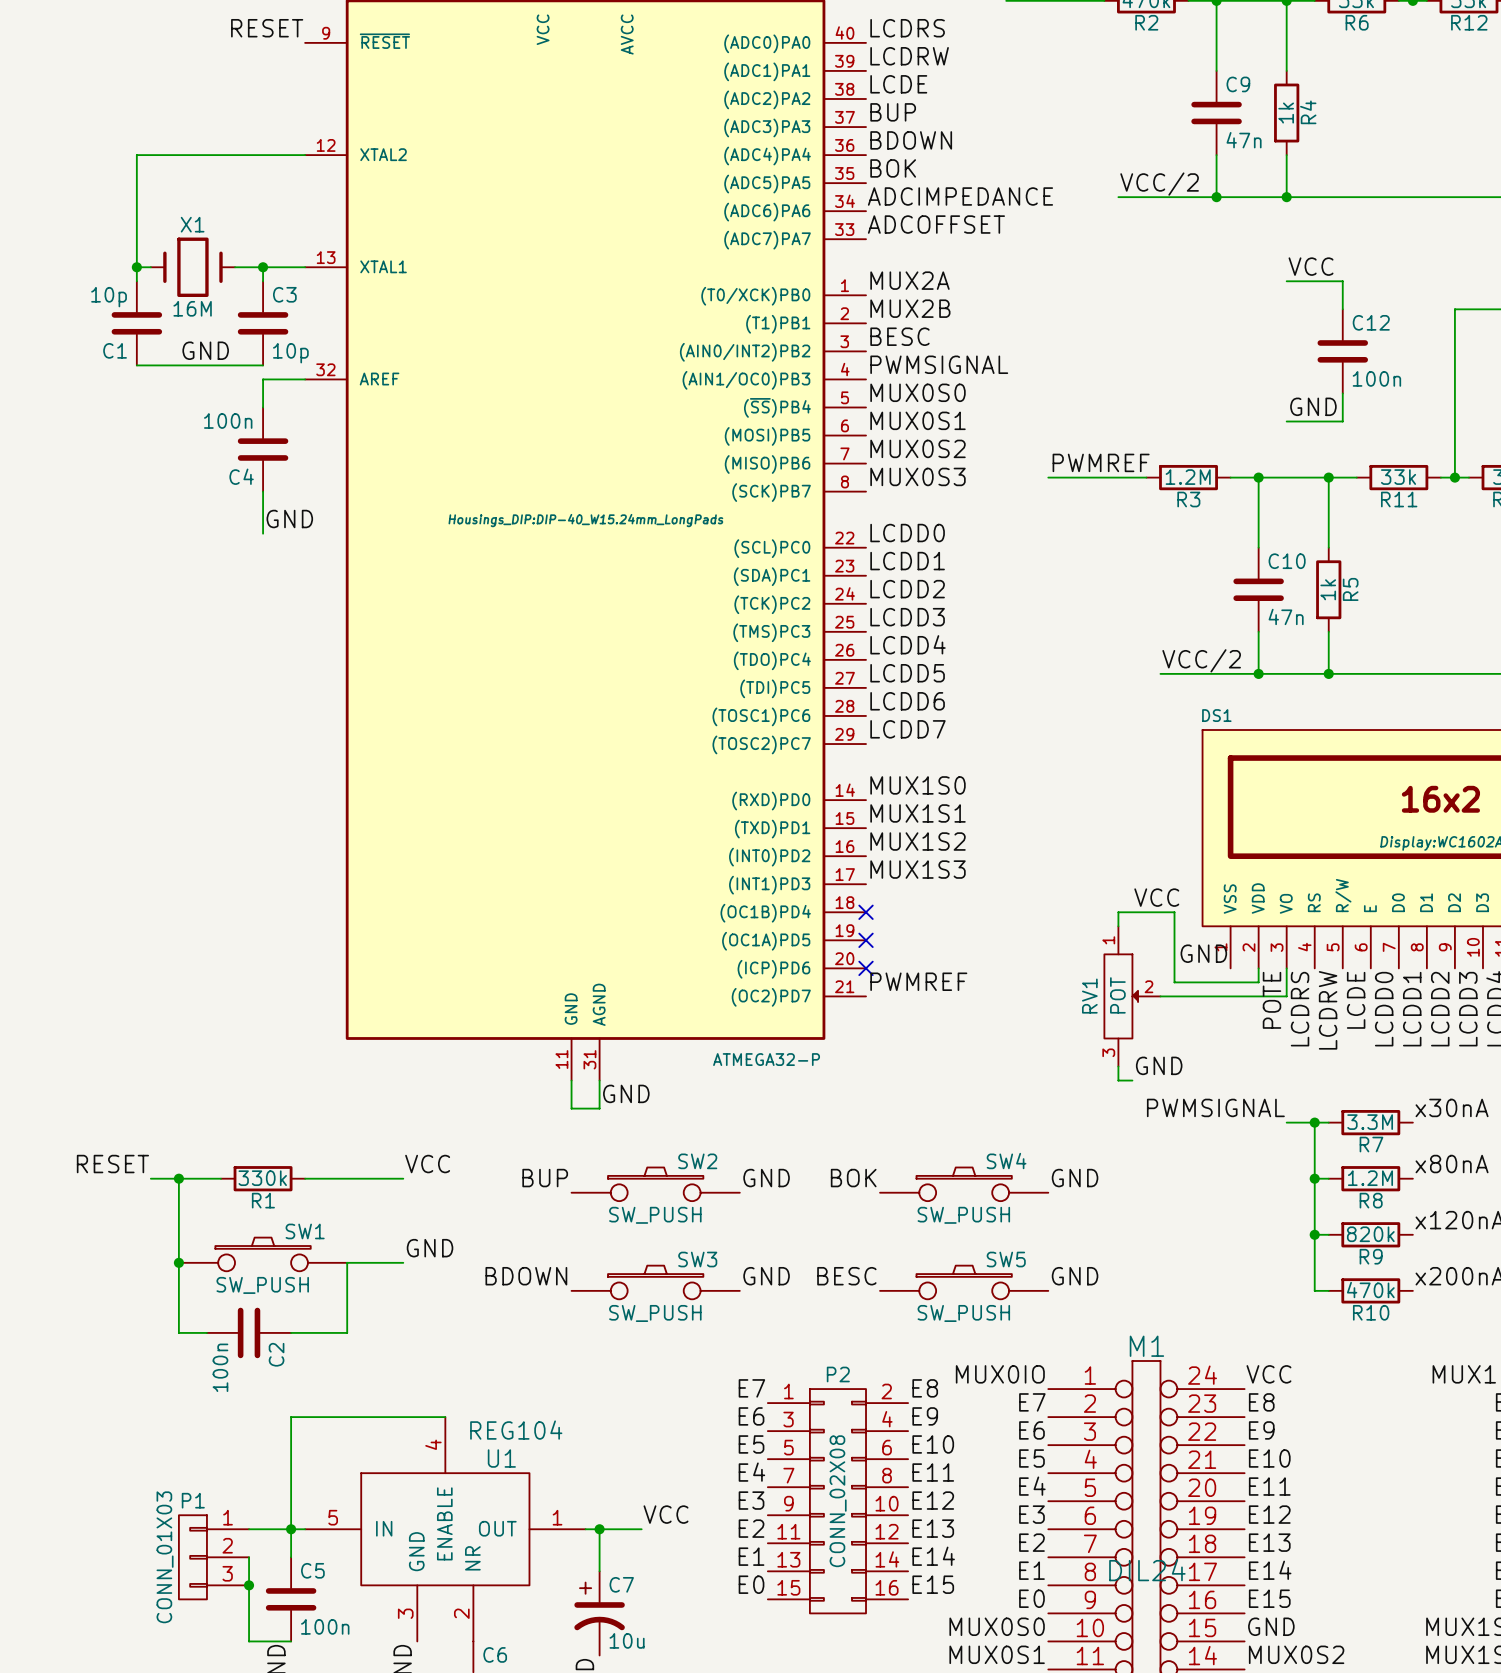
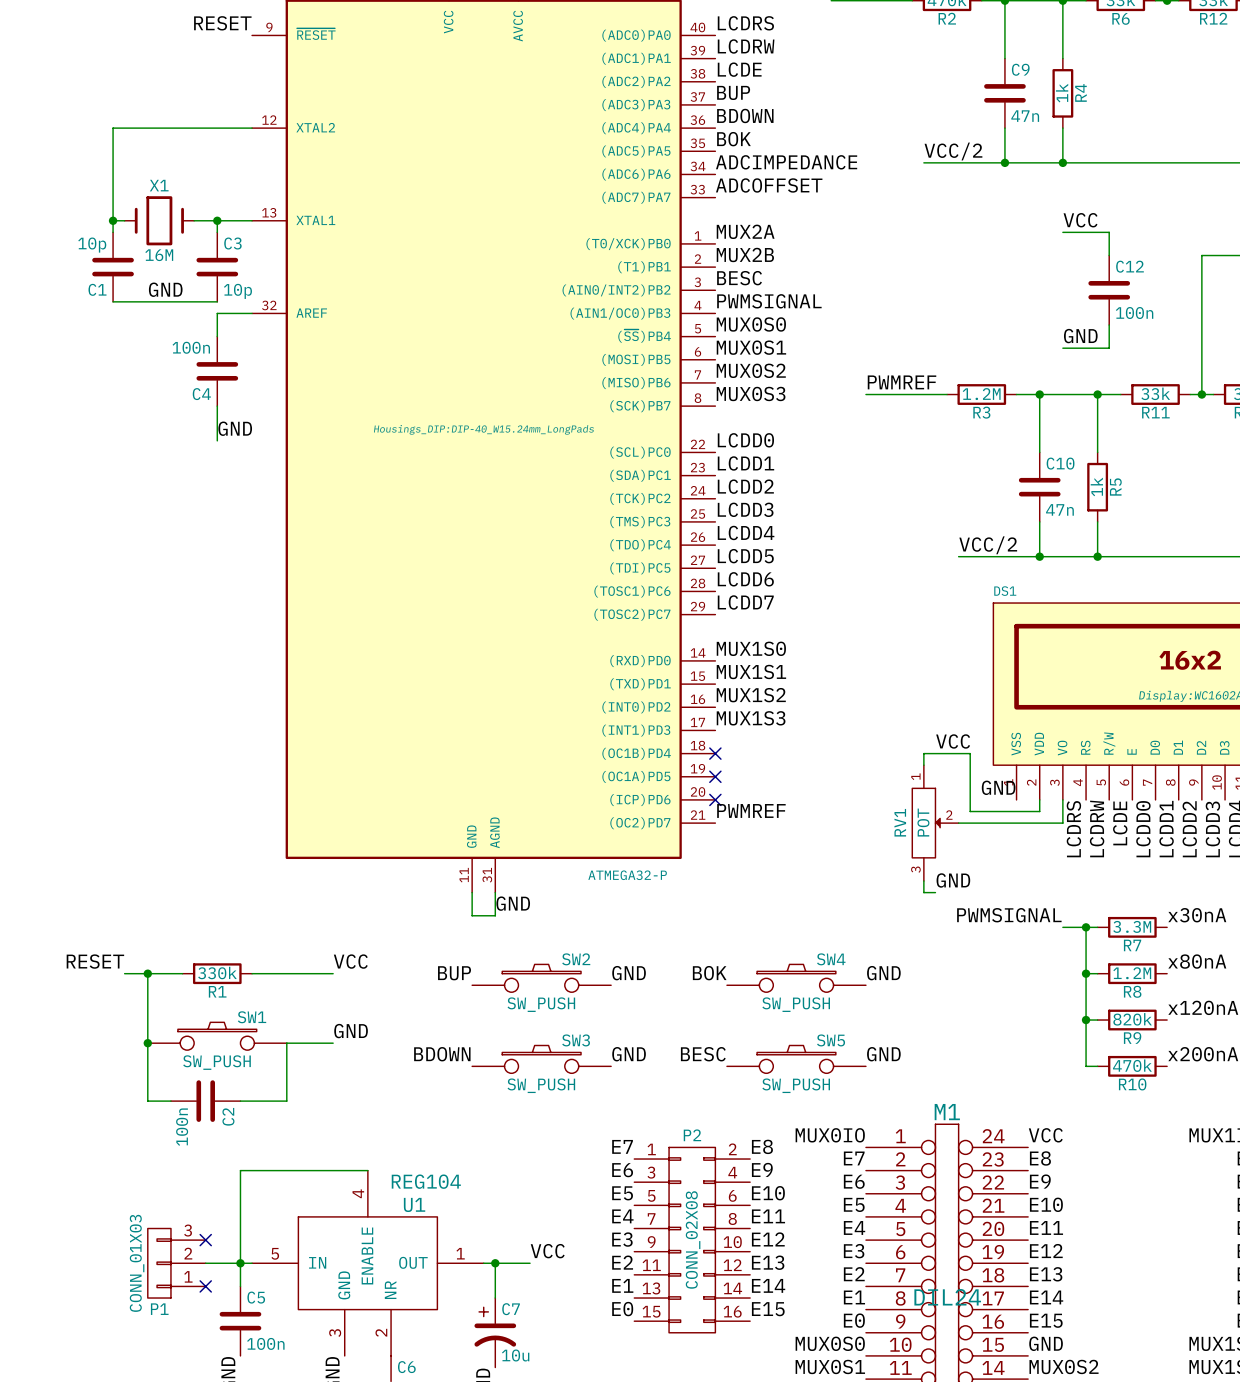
label: POTE (1272, 1000) -> none
no-connect mark: none -> (205, 1240)
P1 flip: as is (192, 1557) -> up-down (159, 1263)
wire: (249, 1557) (249, 1641) (291, 1641) -> none
no-connect mark: none -> (205, 1286)
junction: (249, 1585) -> none

